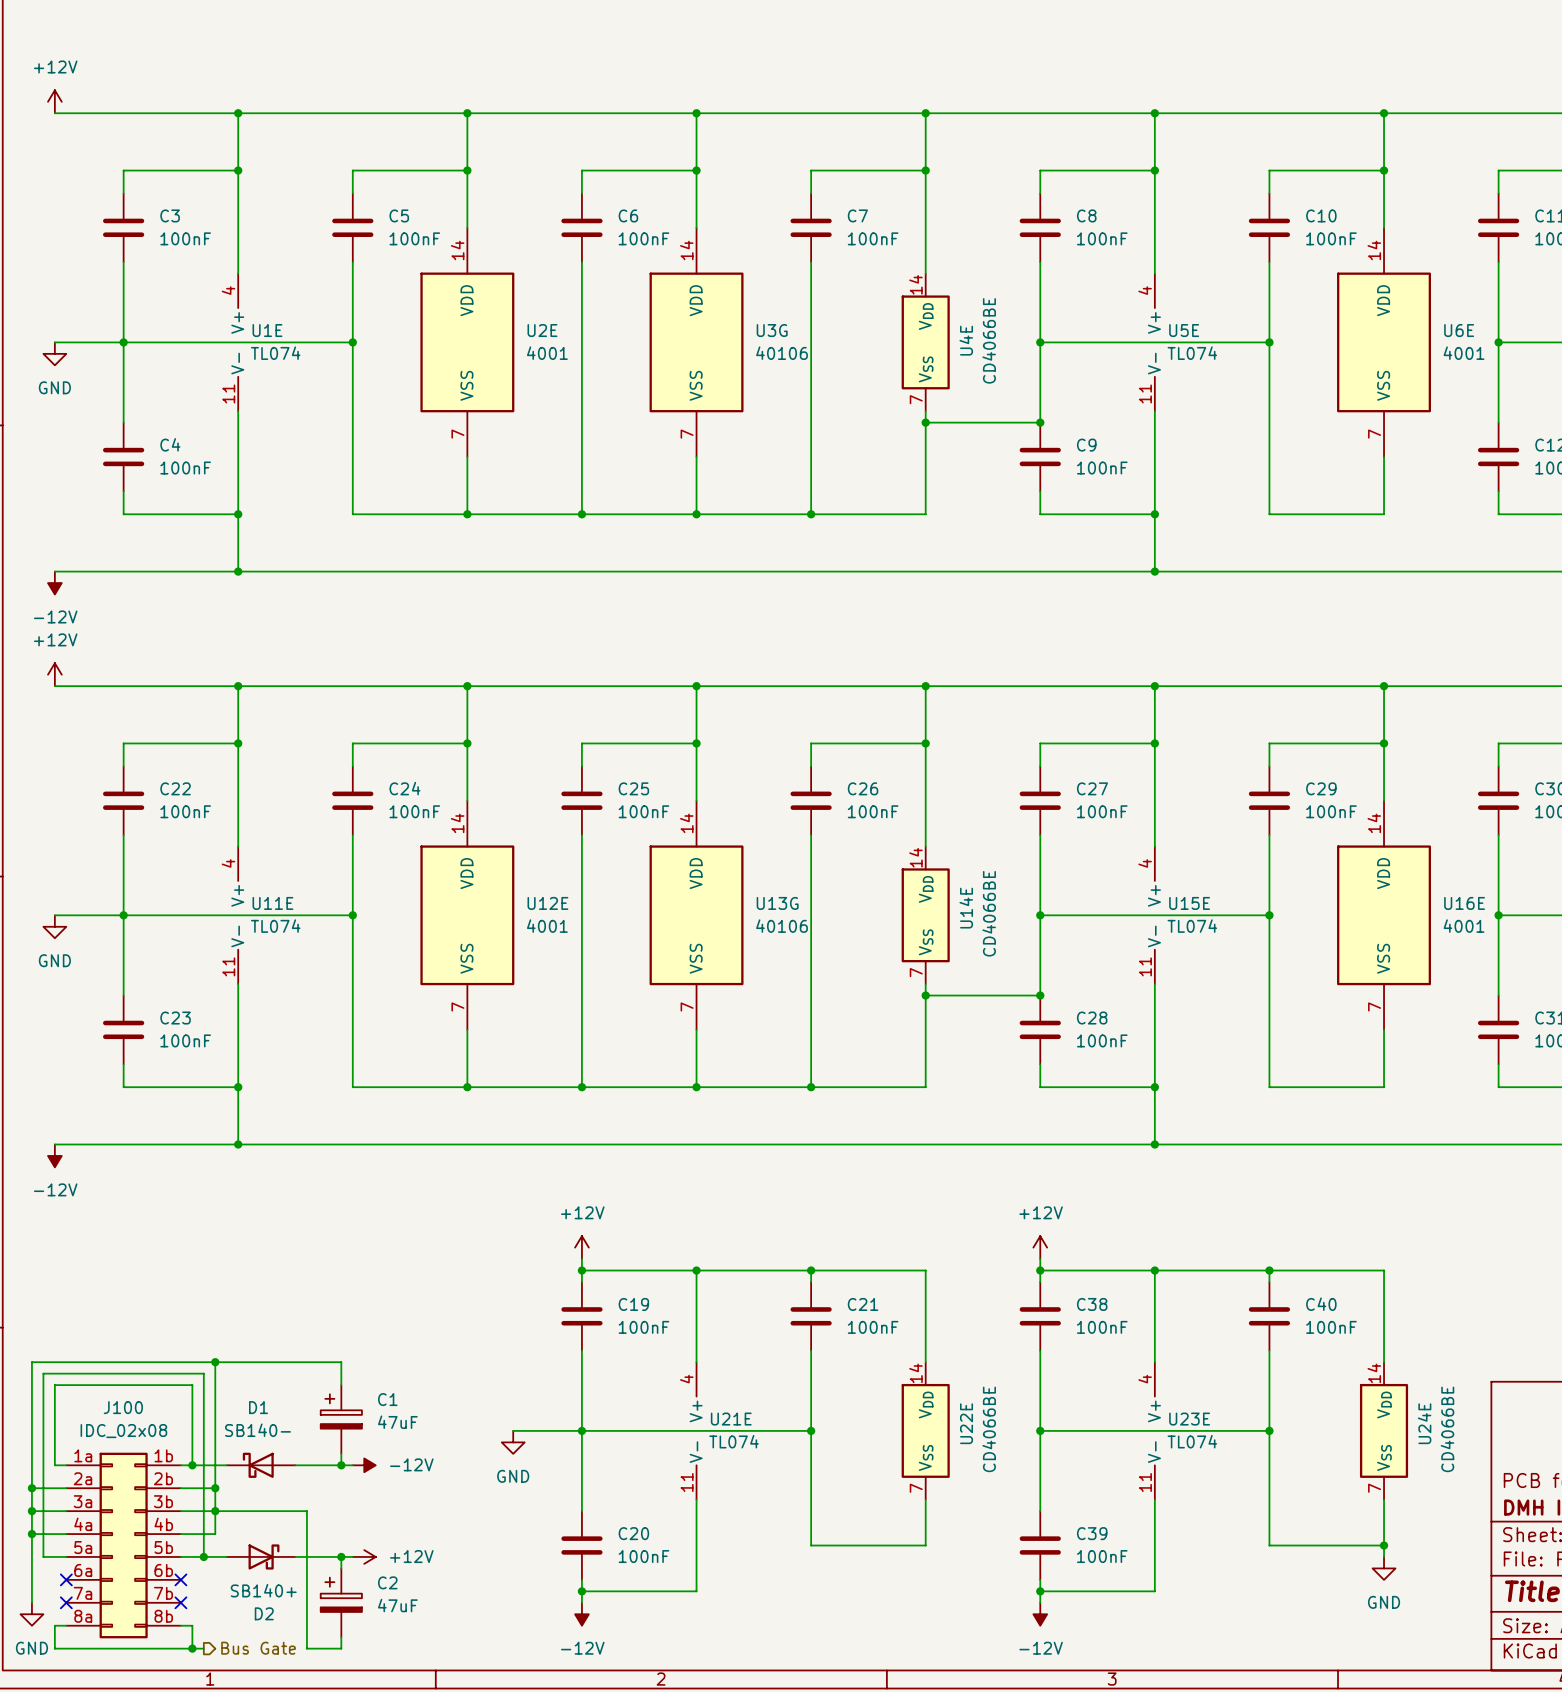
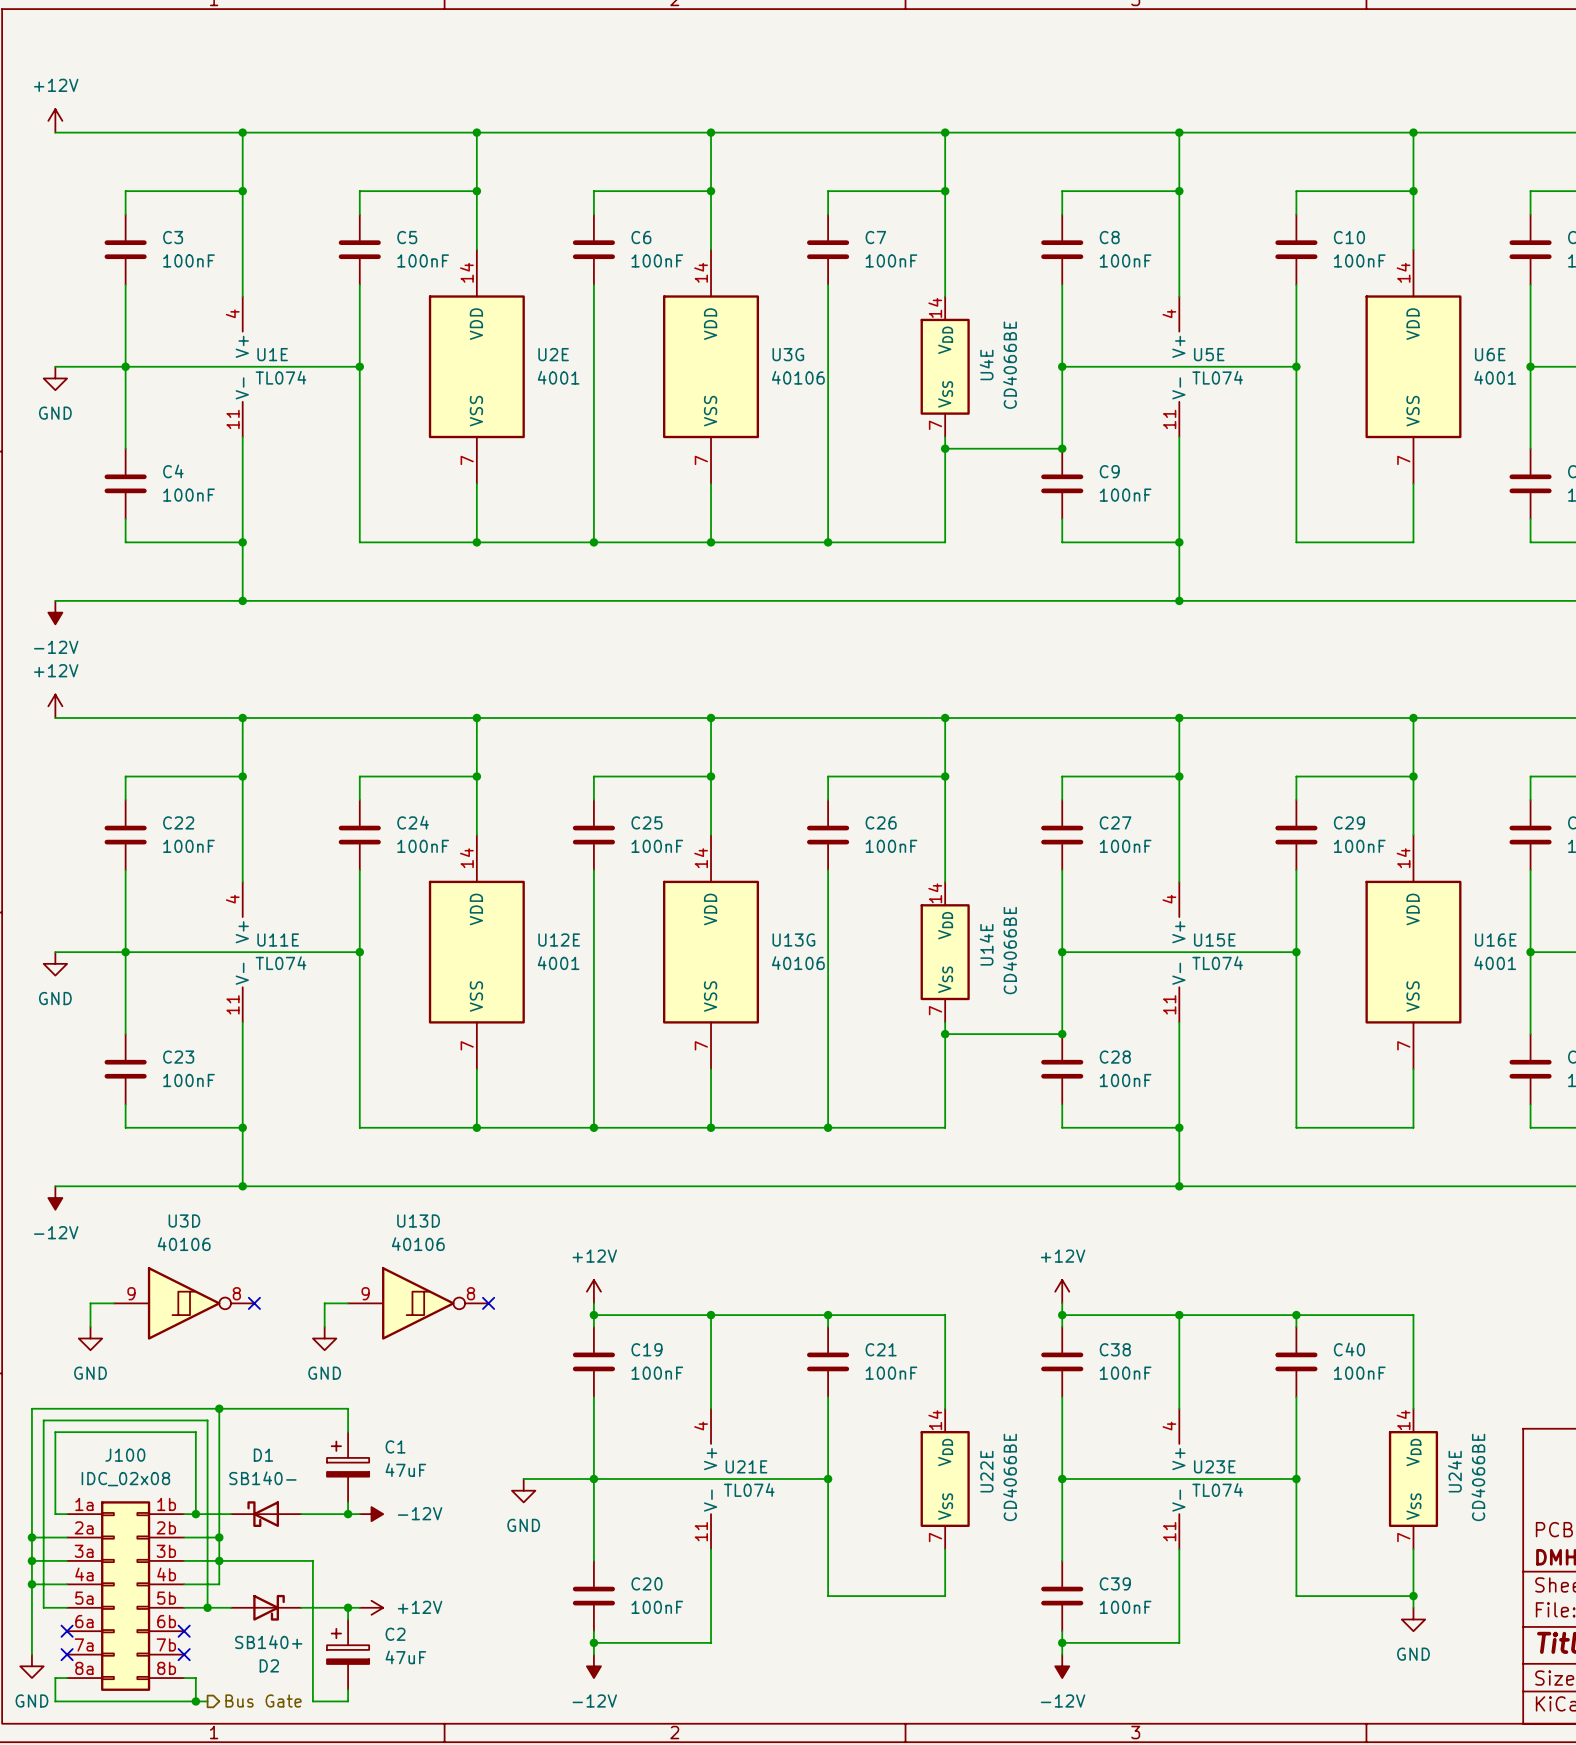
wire: none -> (113, 1303) (90, 1303) (90, 1326)
U3D: none -> 40106 (184, 1303)
no-connect mark: none -> (254, 1303)
wire: none -> (348, 1303) (324, 1303) (324, 1326)
U13D: none -> 40106 (418, 1303)
no-connect mark: none -> (488, 1303)
power symbol: none -> GND (90, 1338)
power symbol: none -> GND (324, 1338)

